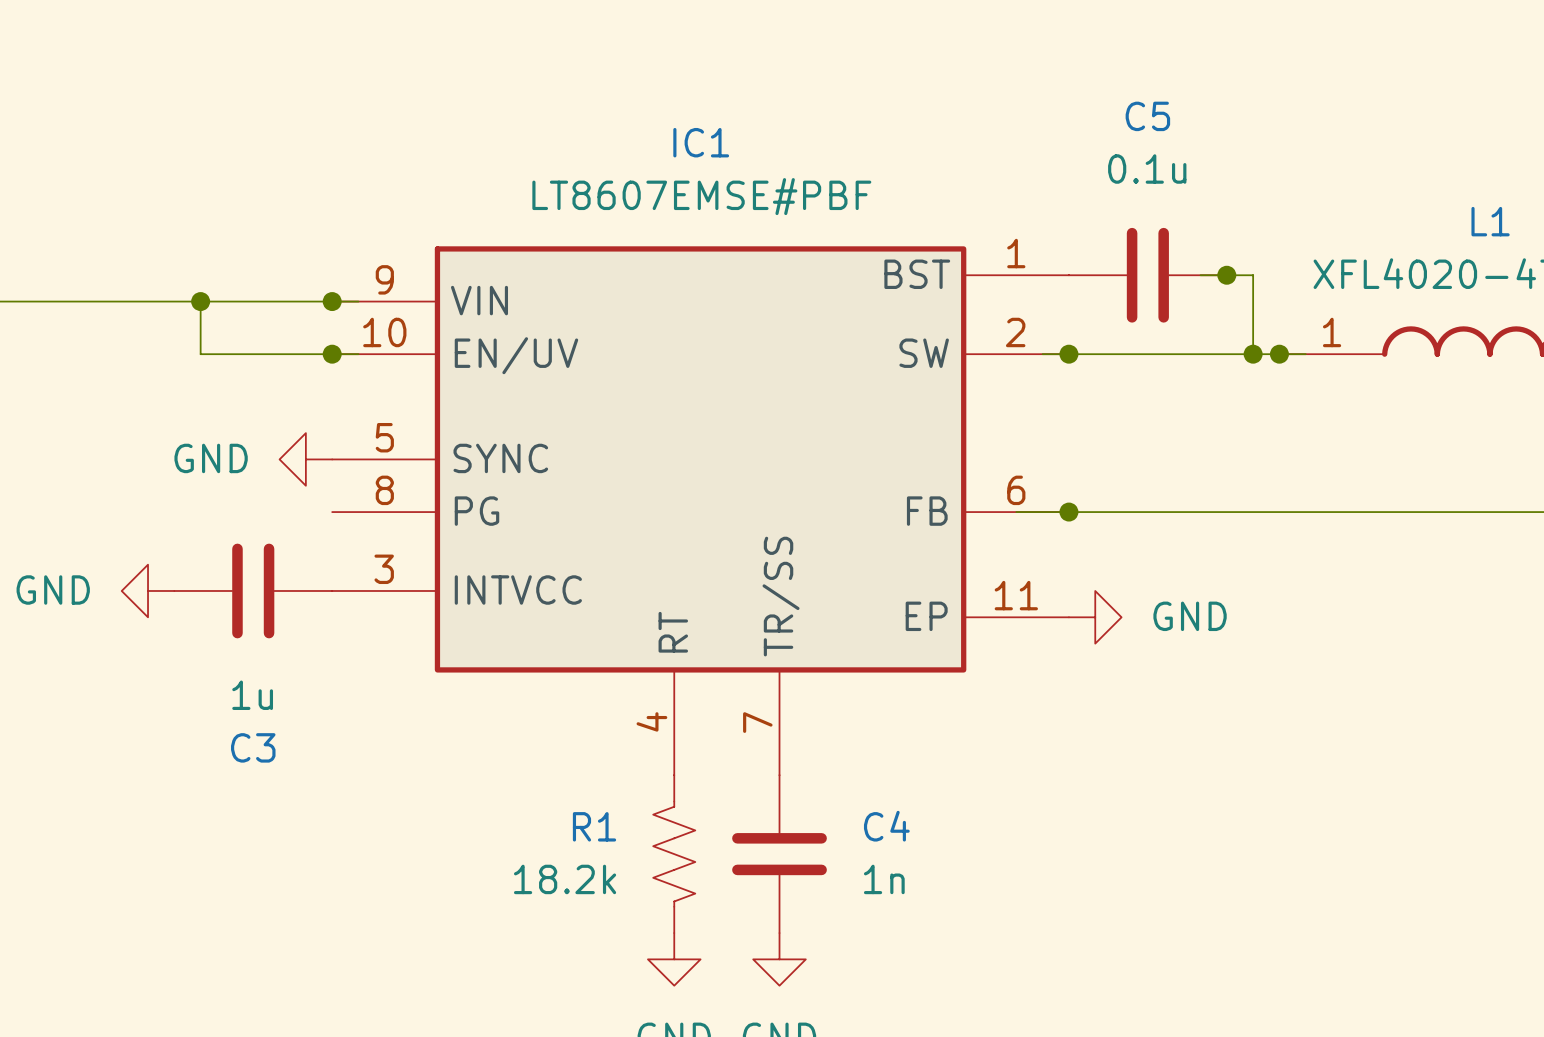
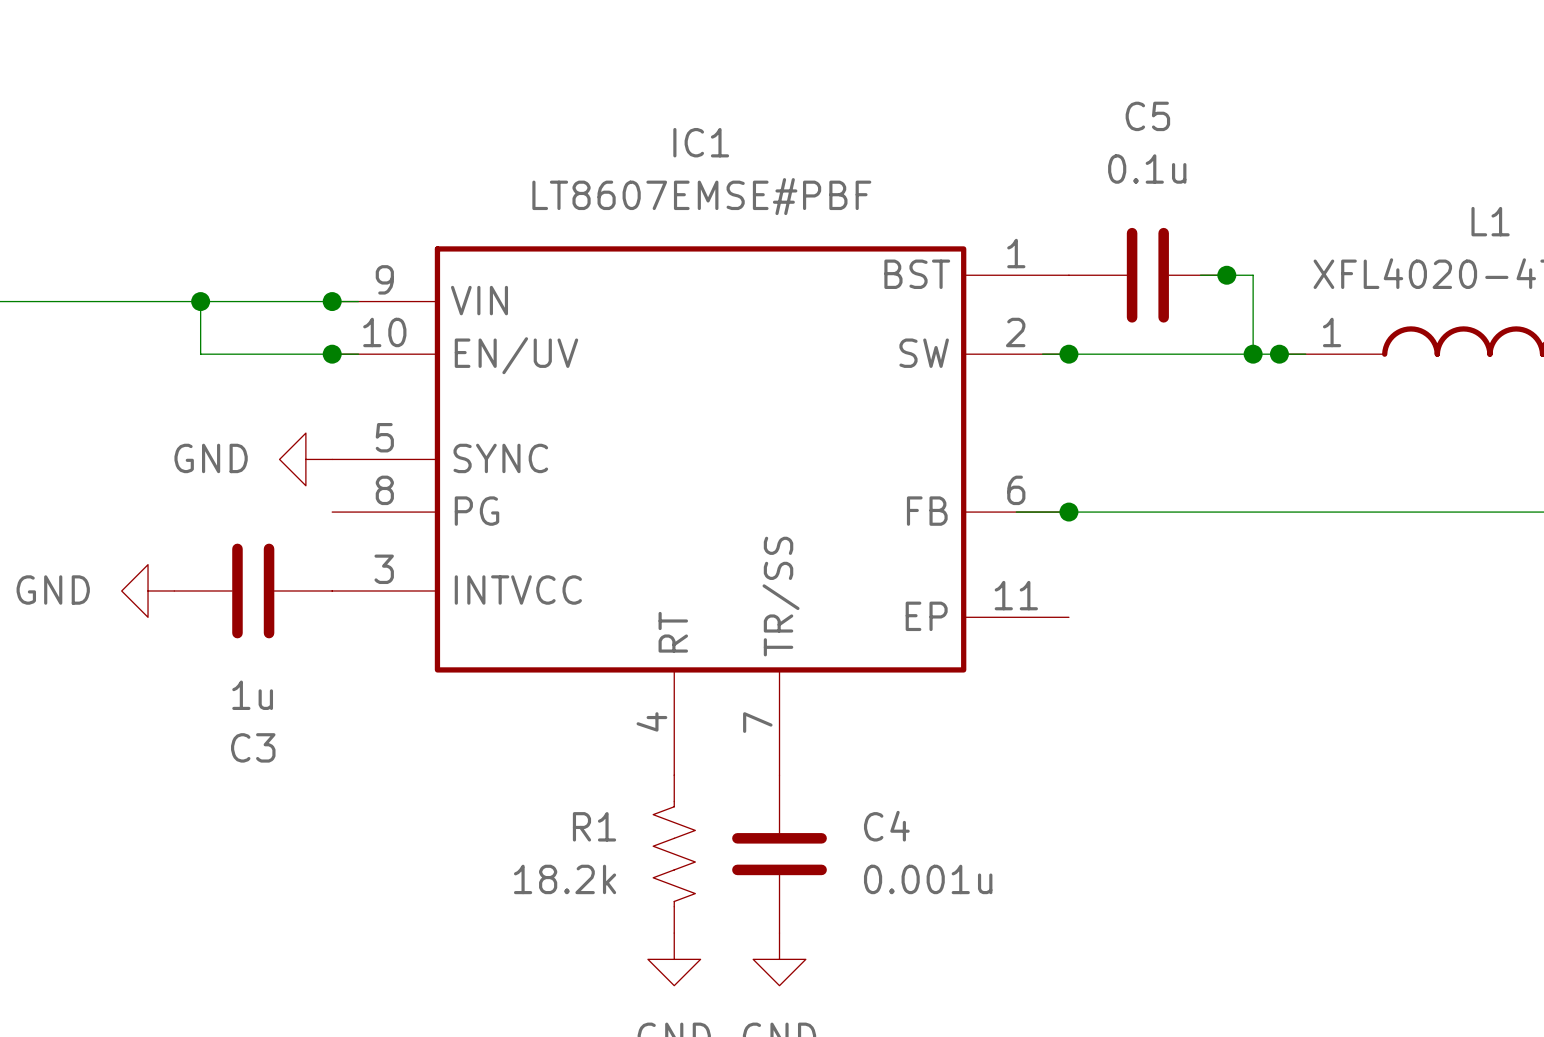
power symbol: GND (1095, 617) -> none
C4 value: 1n (884, 879) -> 0.001u (928, 879)

